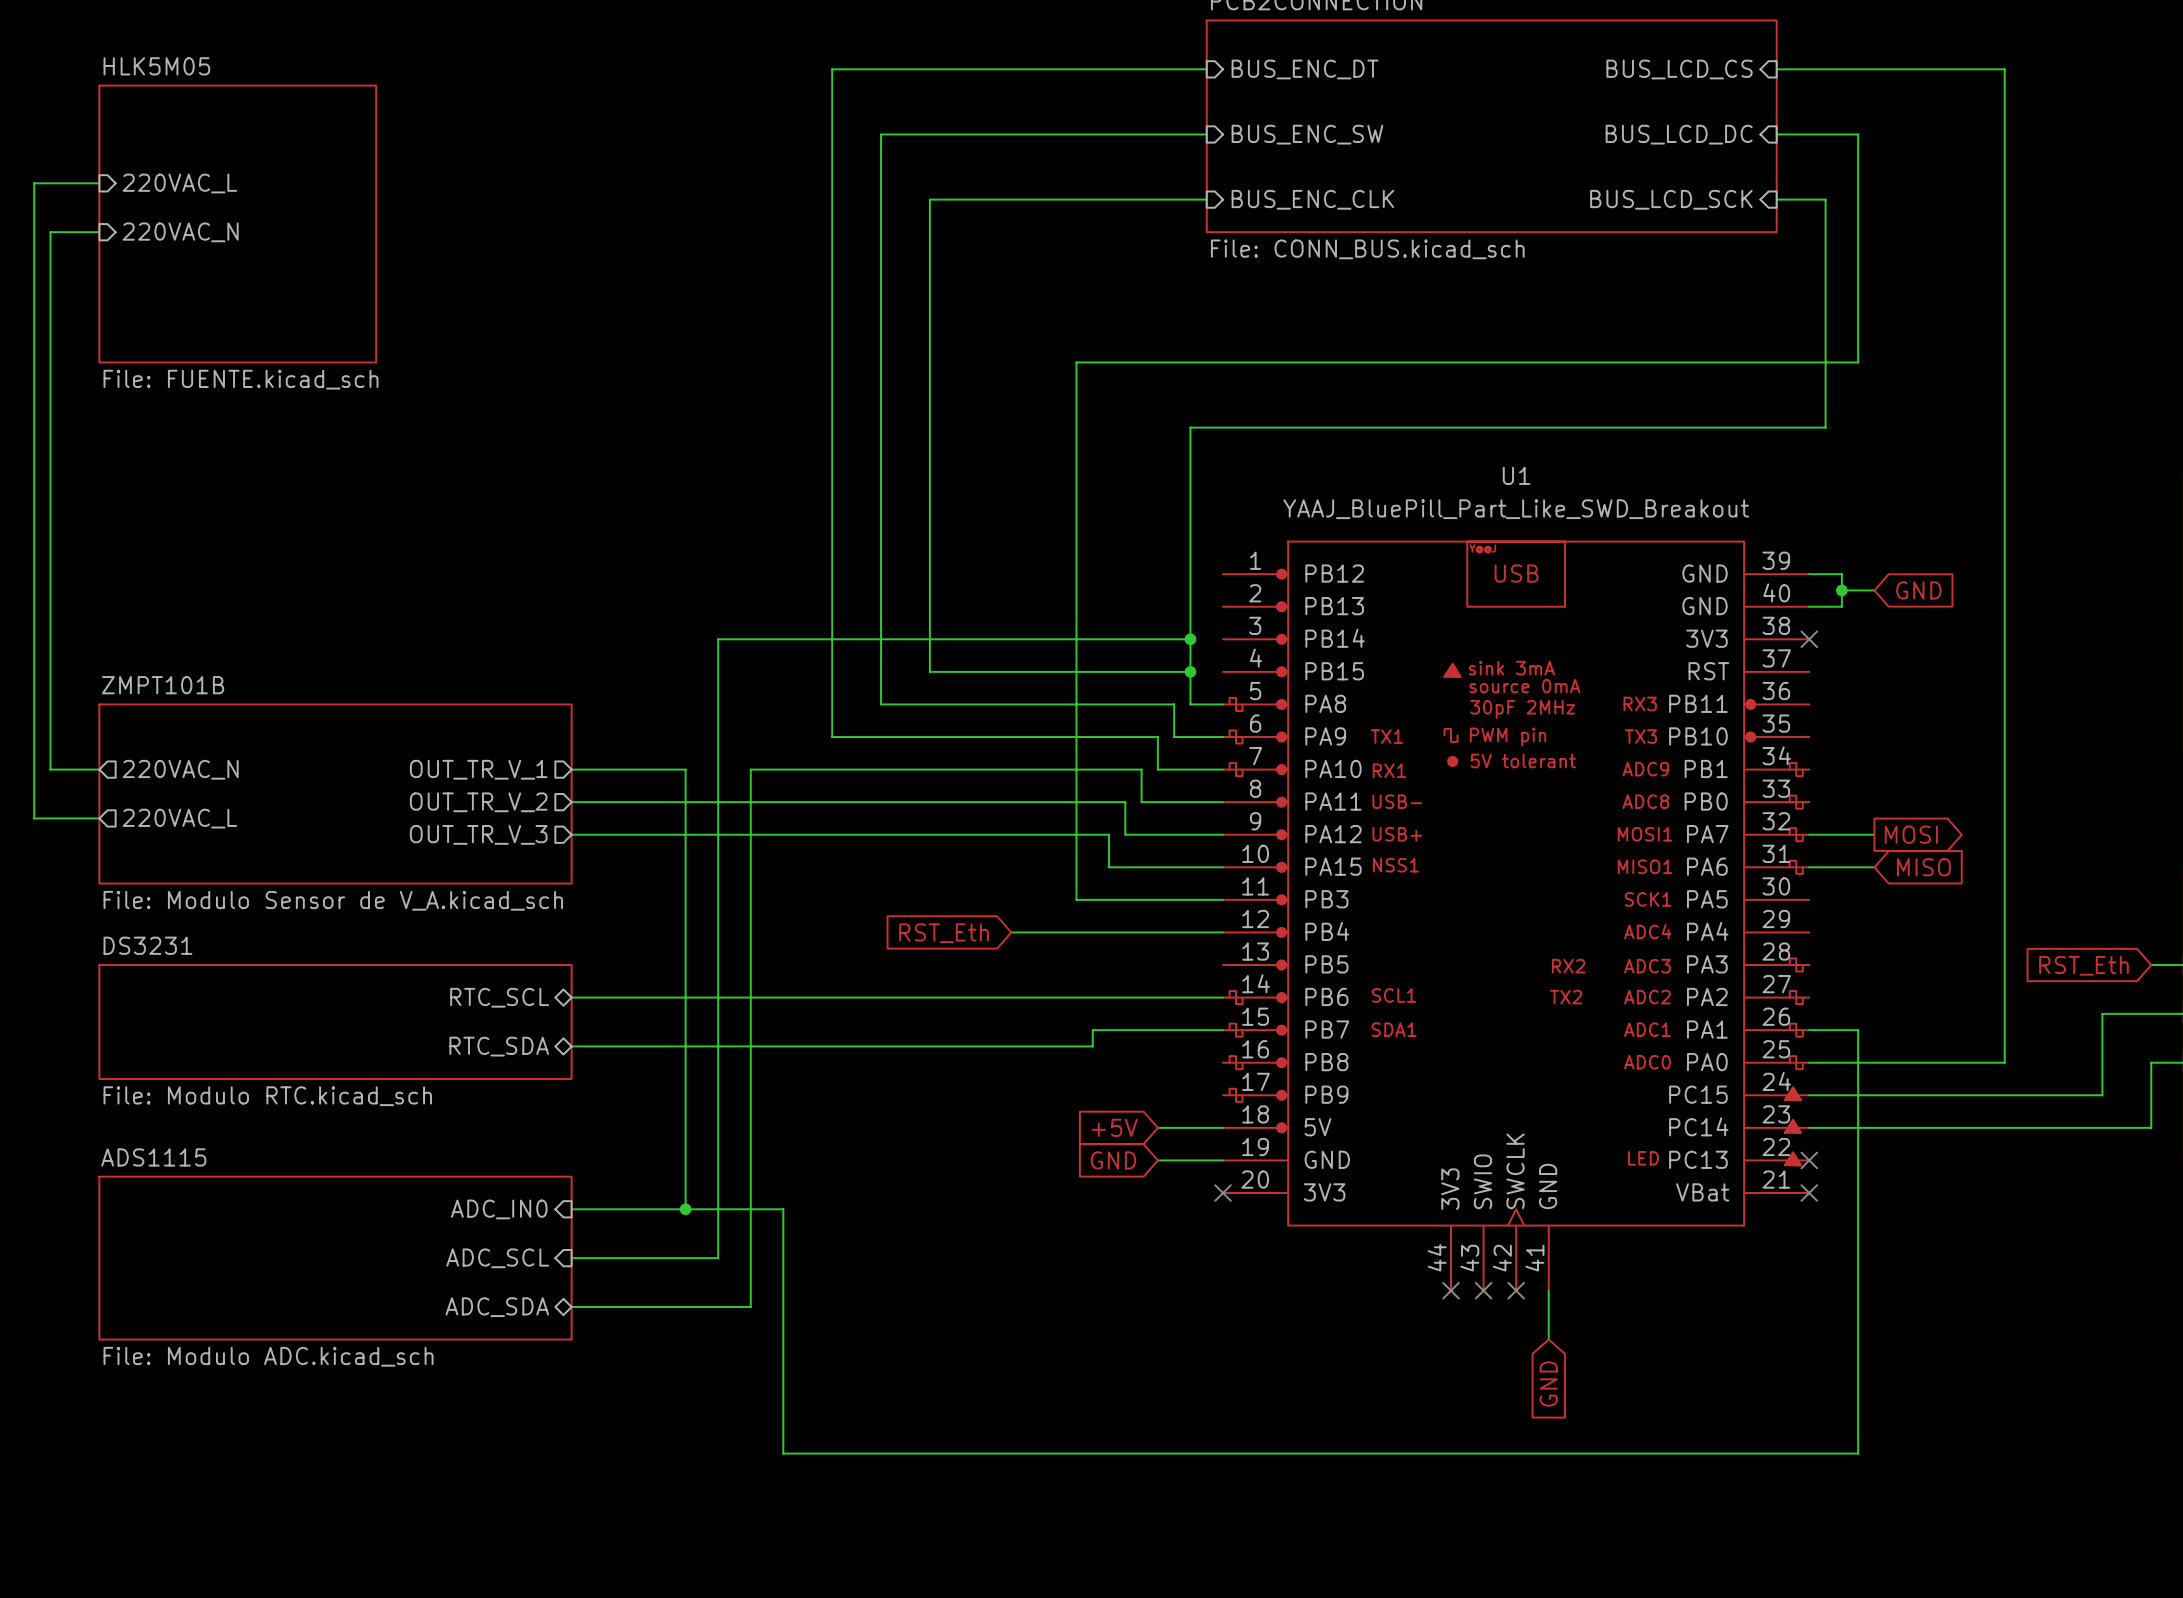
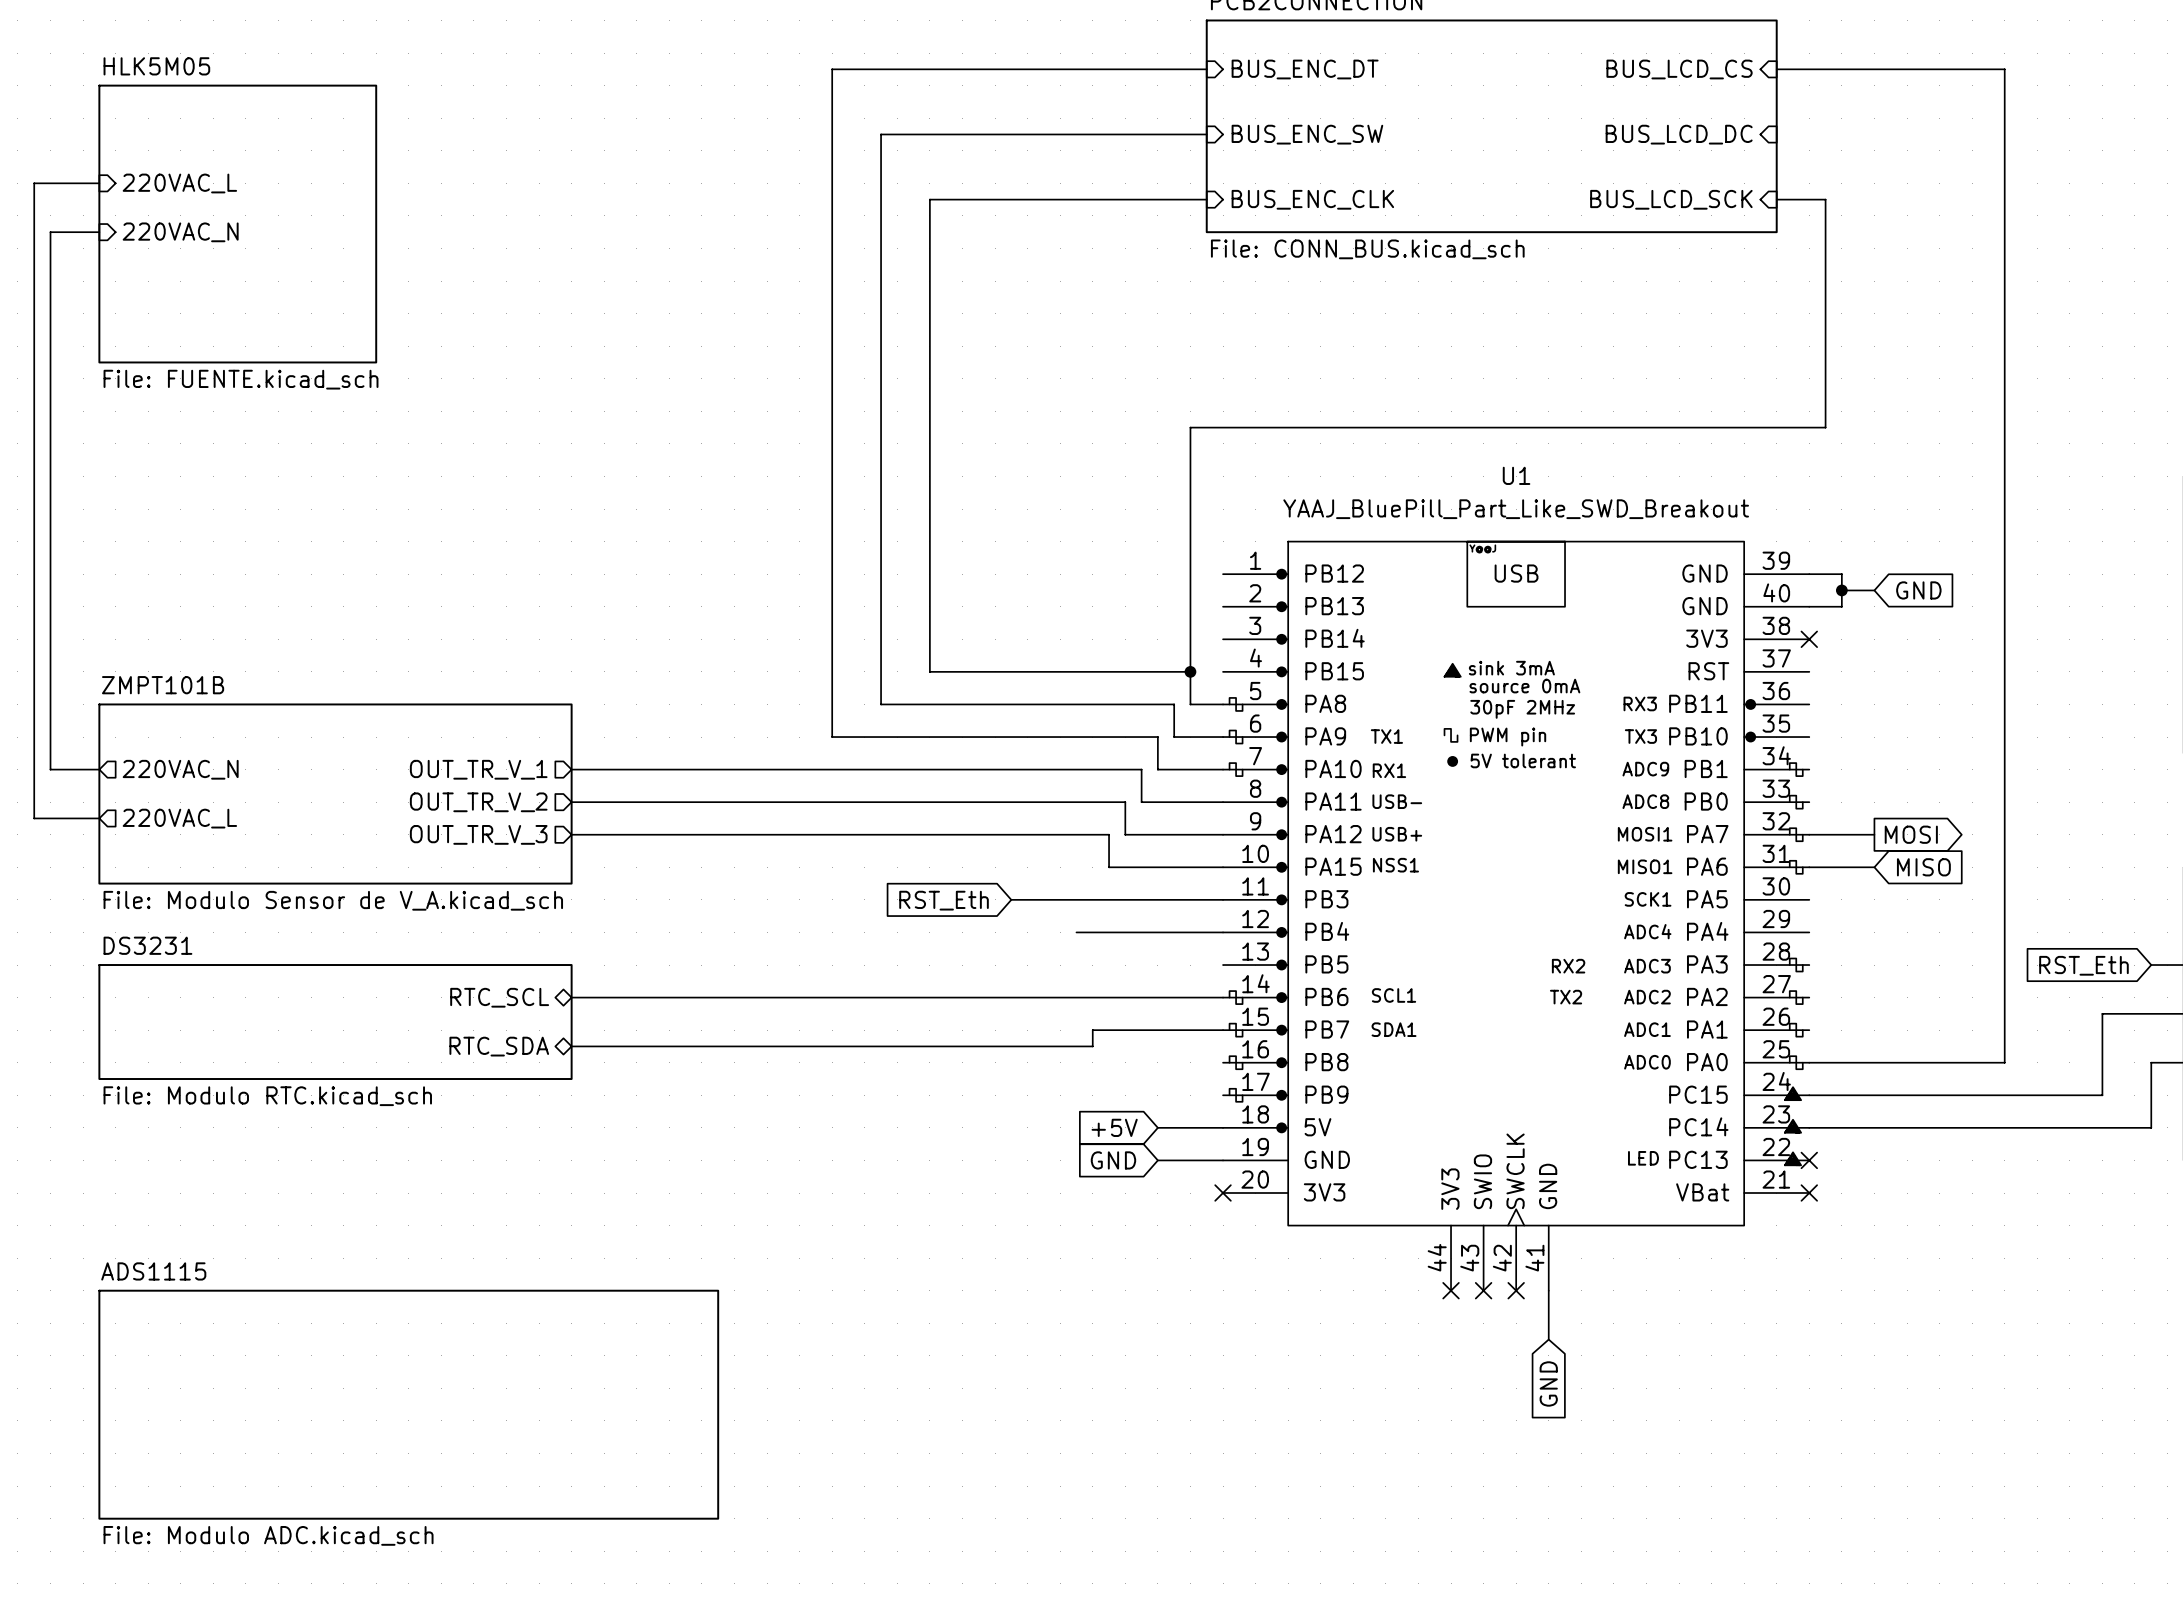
wire: (1776, 134) (1858, 134) (1858, 362) (1076, 362) (1076, 899) -> (1011, 899) (1076, 899)
wire: (1190, 639) (718, 639) (718, 1258) (571, 1258) -> none
junction: (1190, 639) -> none
wire: (685, 769) (685, 1209) -> (685, 769) (750, 769)
wire: (750, 769) (750, 1306) (571, 1306) -> none
wire: (1011, 932) (1076, 932) -> none
global label position: RST_Eth (944, 933) -> RST_Eth (944, 900)
wire: (1809, 1030) (1858, 1030) (1858, 1453) (783, 1453) (783, 1209) (571, 1209) -> none
sheet ADS1115 name position: ADS1115 (153, 1157) -> ADS1115 (153, 1271)
sheet ADS1115 shape: [98, 1175, 573, 1341] -> [98, 1289, 720, 1520]
sheet pin: ADC_IN0 (499, 1209) -> none
junction: (685, 1209) -> none
sheet pin: ADC_SCL (497, 1258) -> none
sheet pin: ADC_SDA (497, 1307) -> none
sheet ADS1115 value position: File: Modulo ADC.kicad_sch (268, 1356) -> File: Modulo ADC.kicad_sch (268, 1535)

